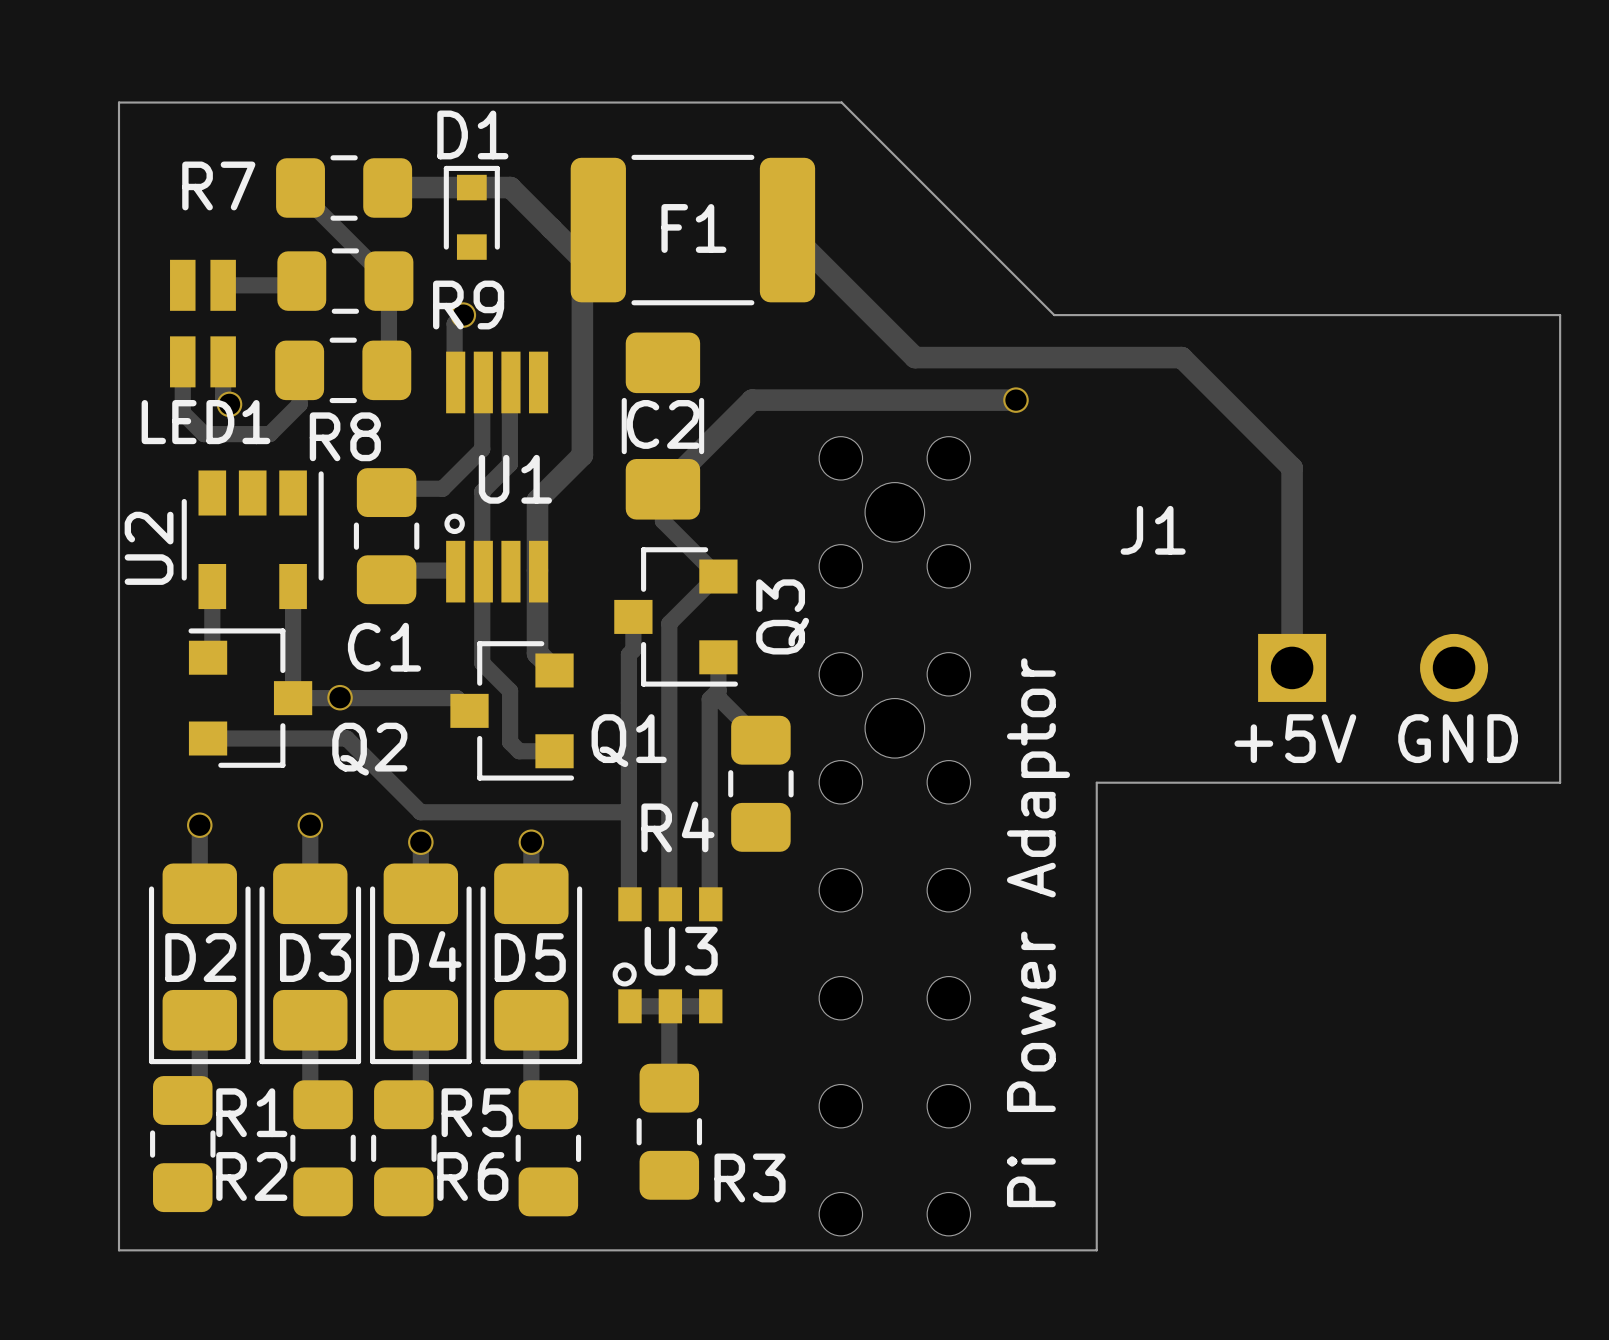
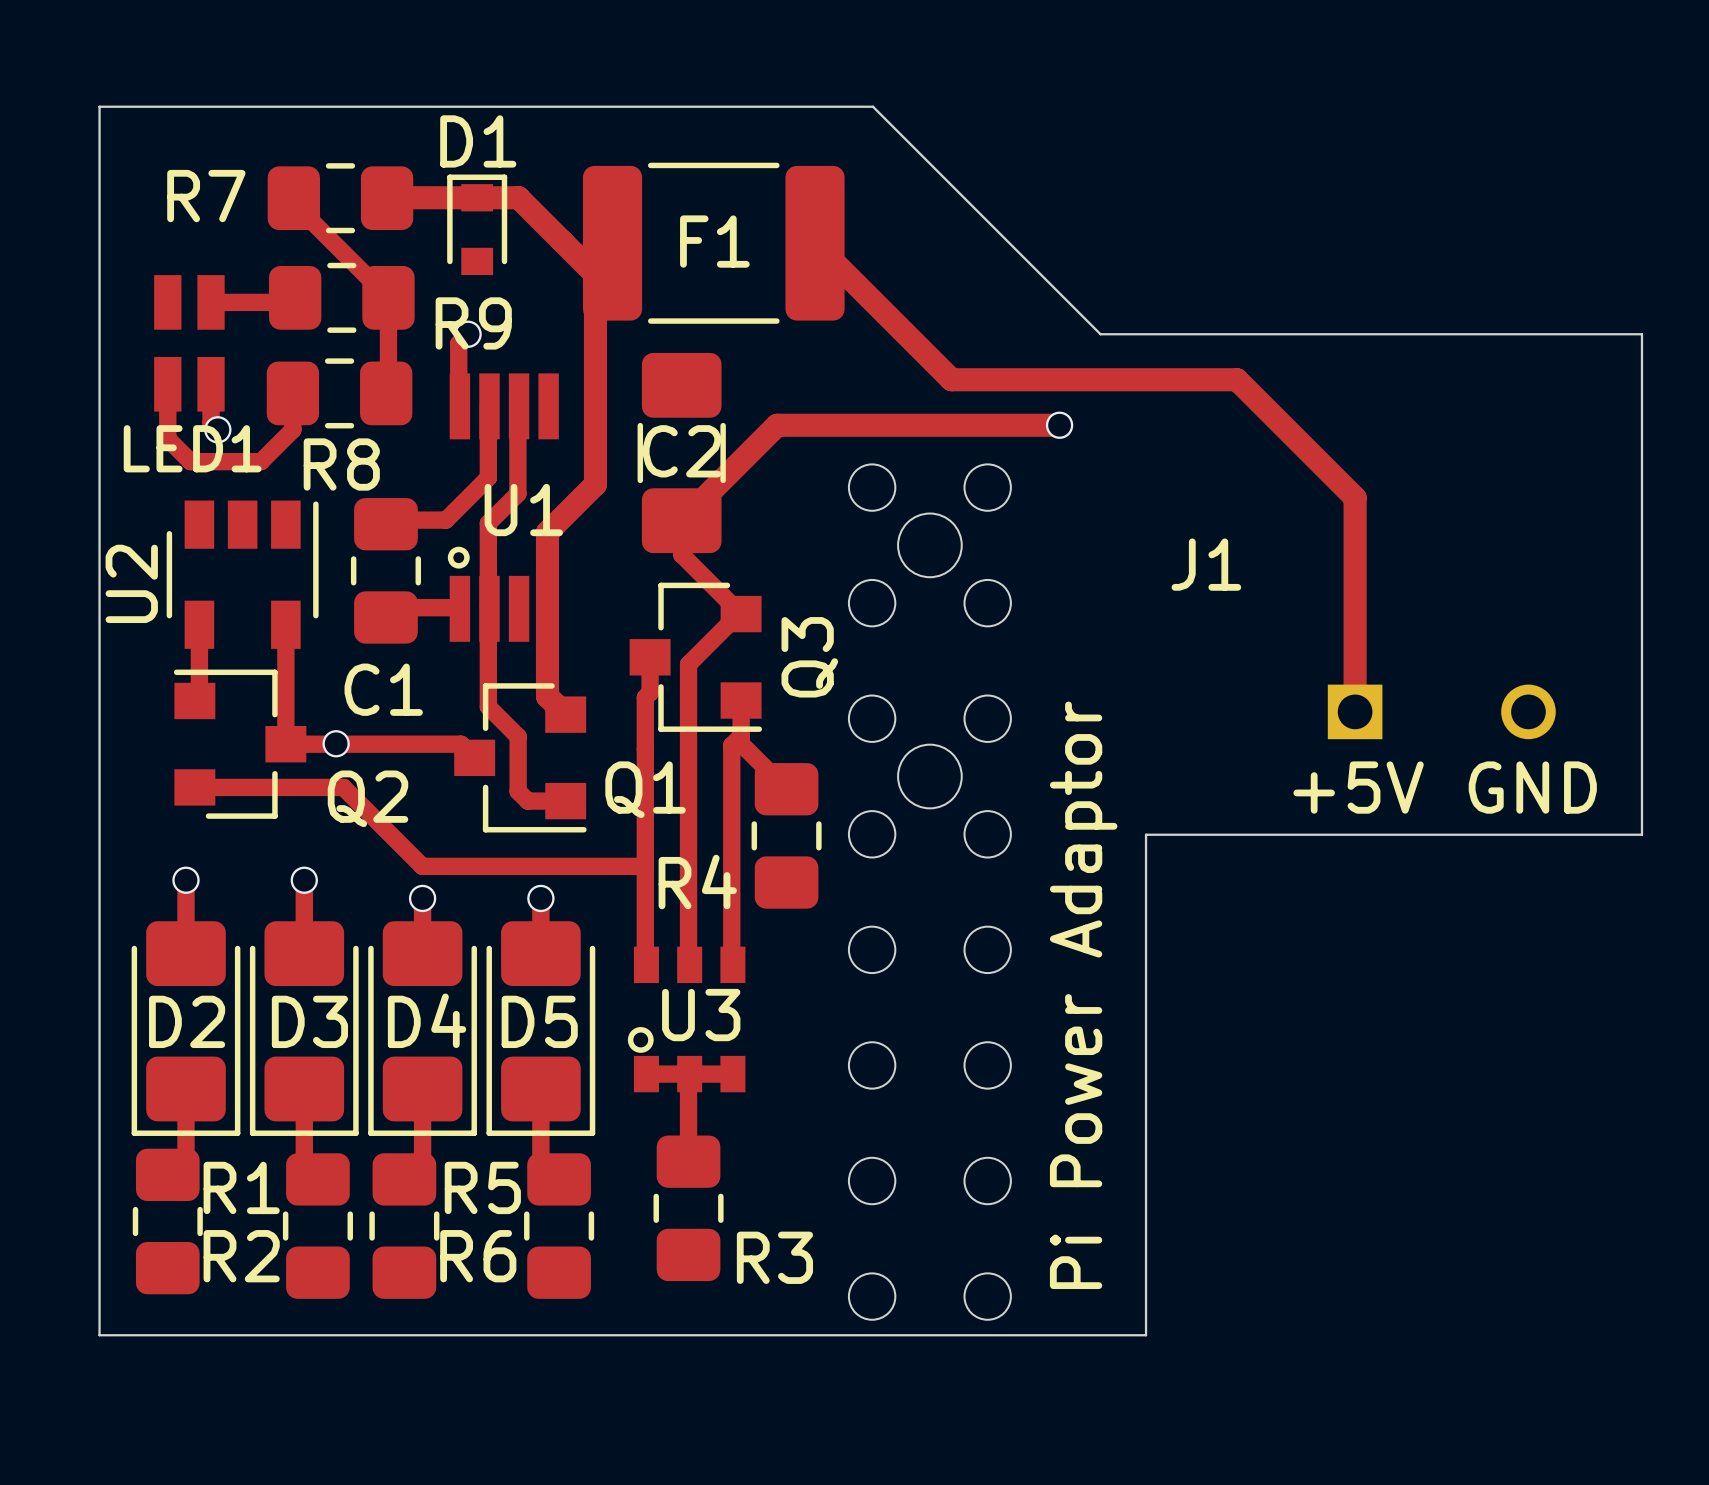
J1 footprint: [1258, 633, 1489, 702] -> [1327, 684, 1556, 740]

